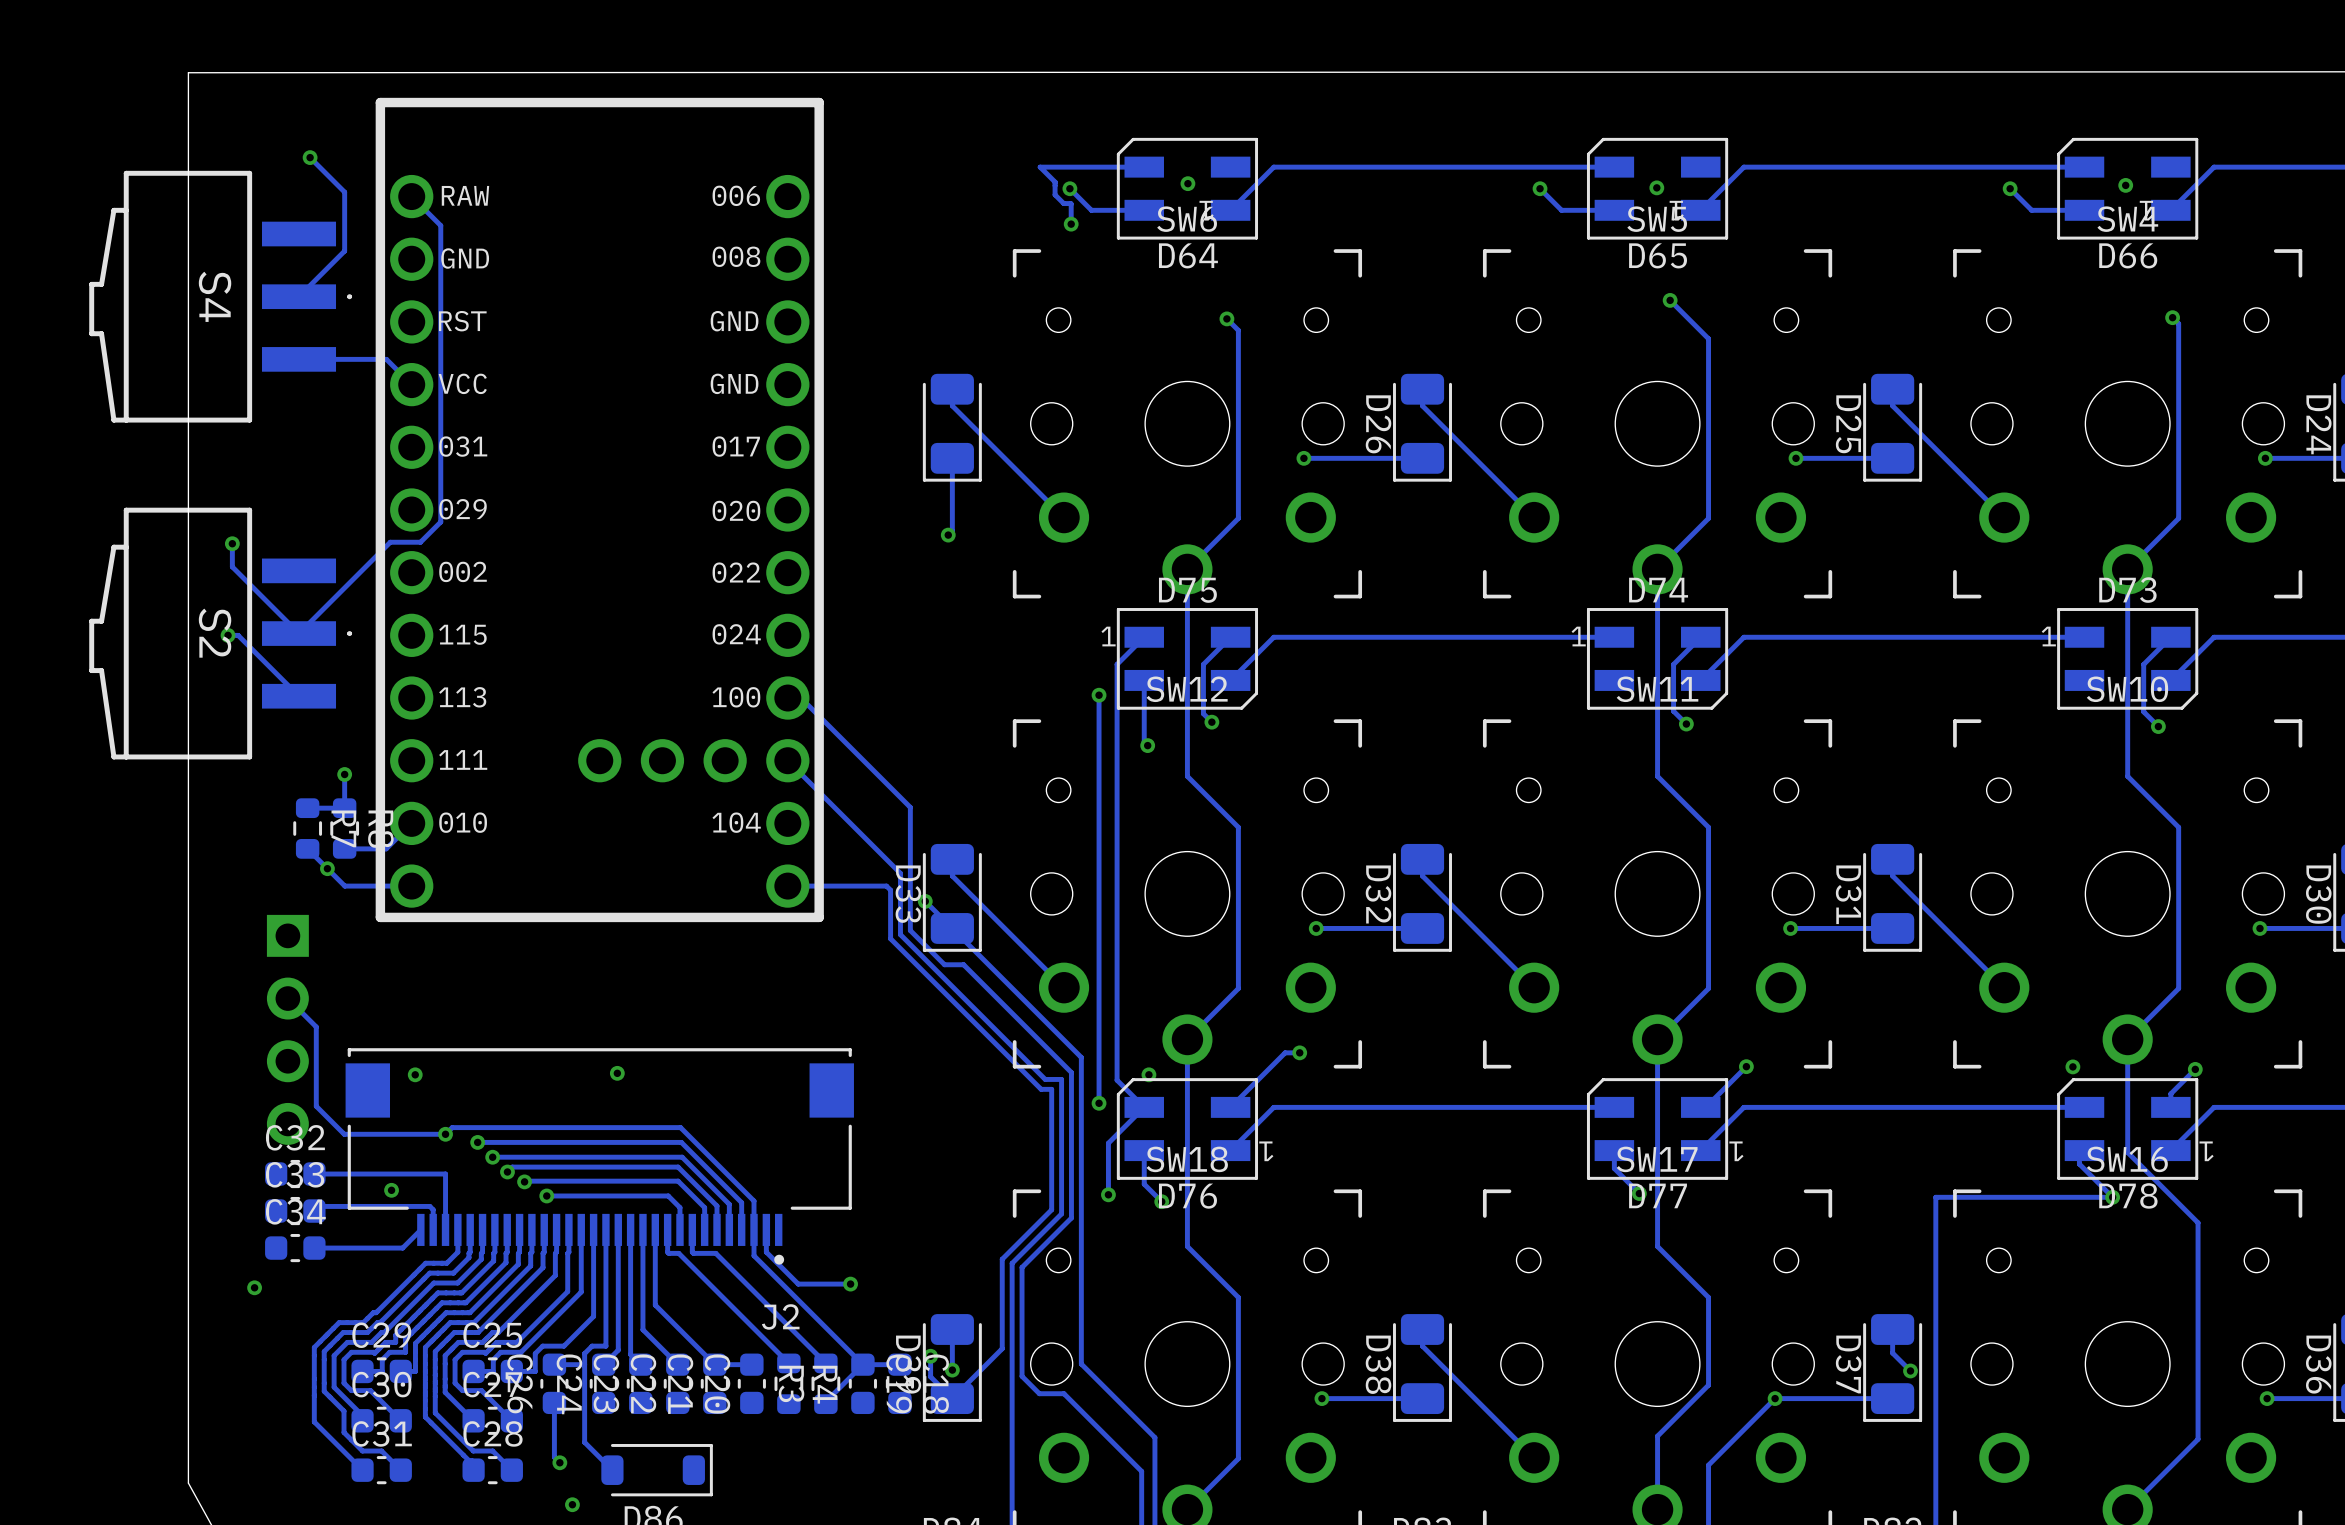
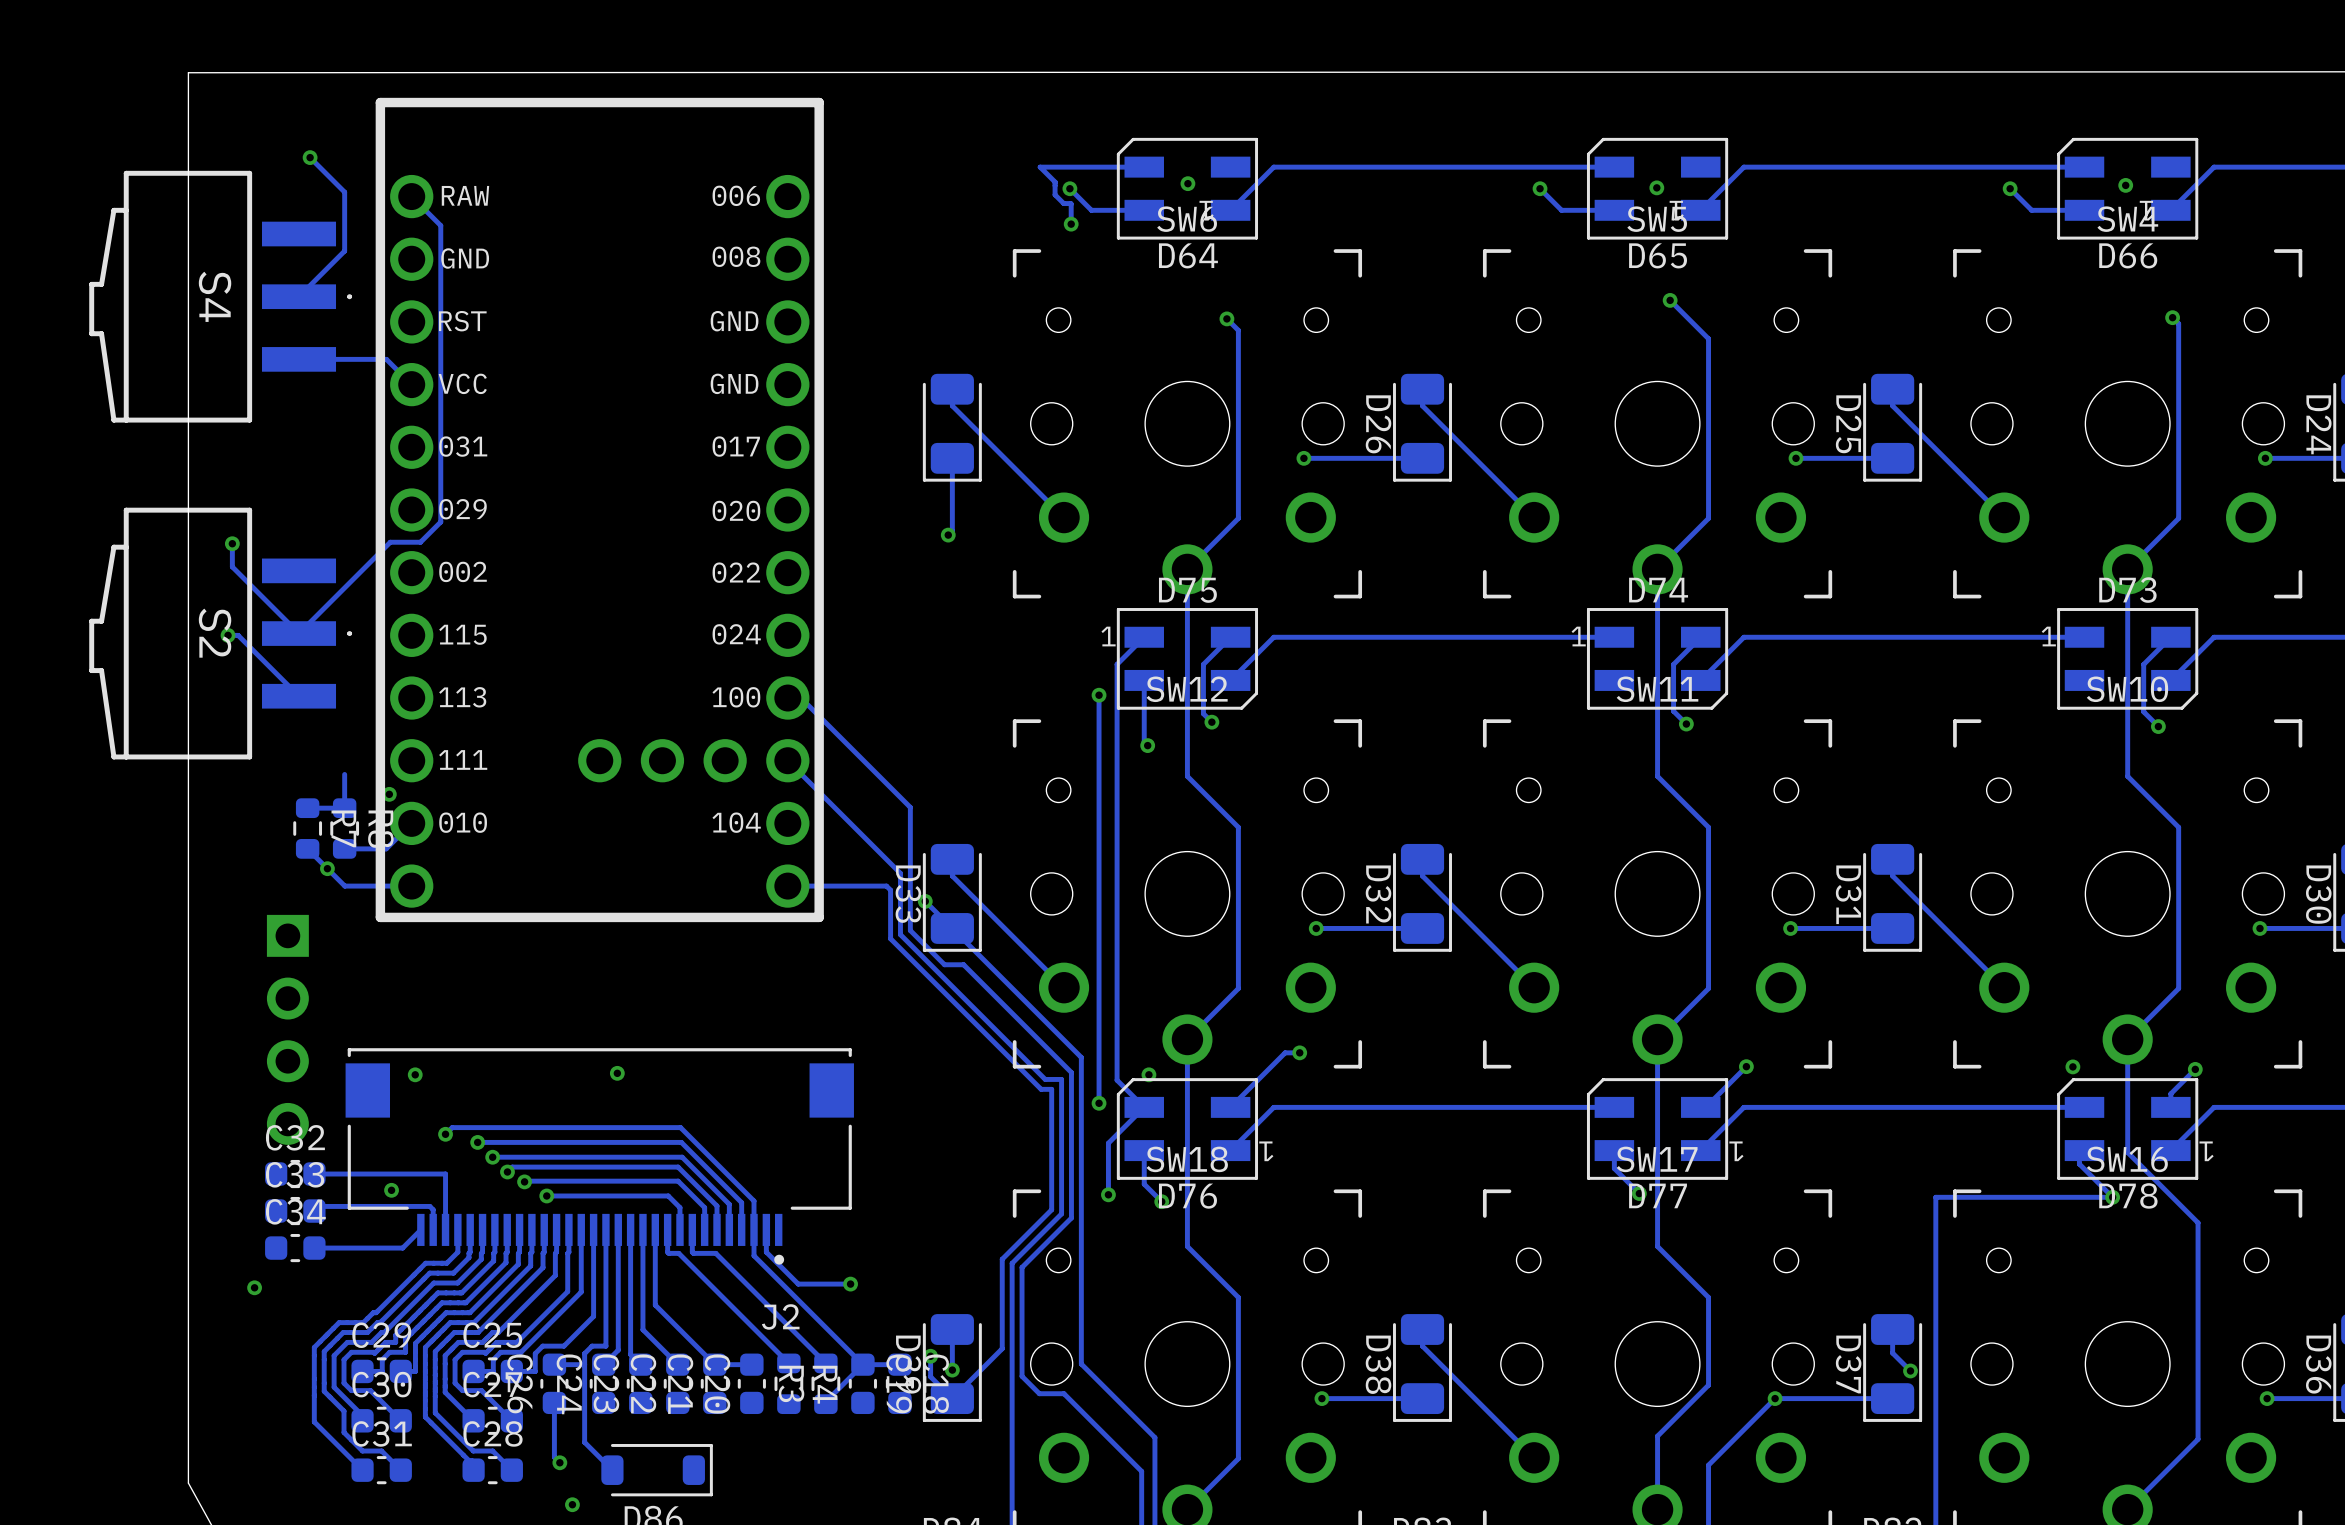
via position: (344, 774) -> (389, 794)
track: (287, 998) (316, 1026) (316, 1106) (344, 1134) (445, 1134) -> none

